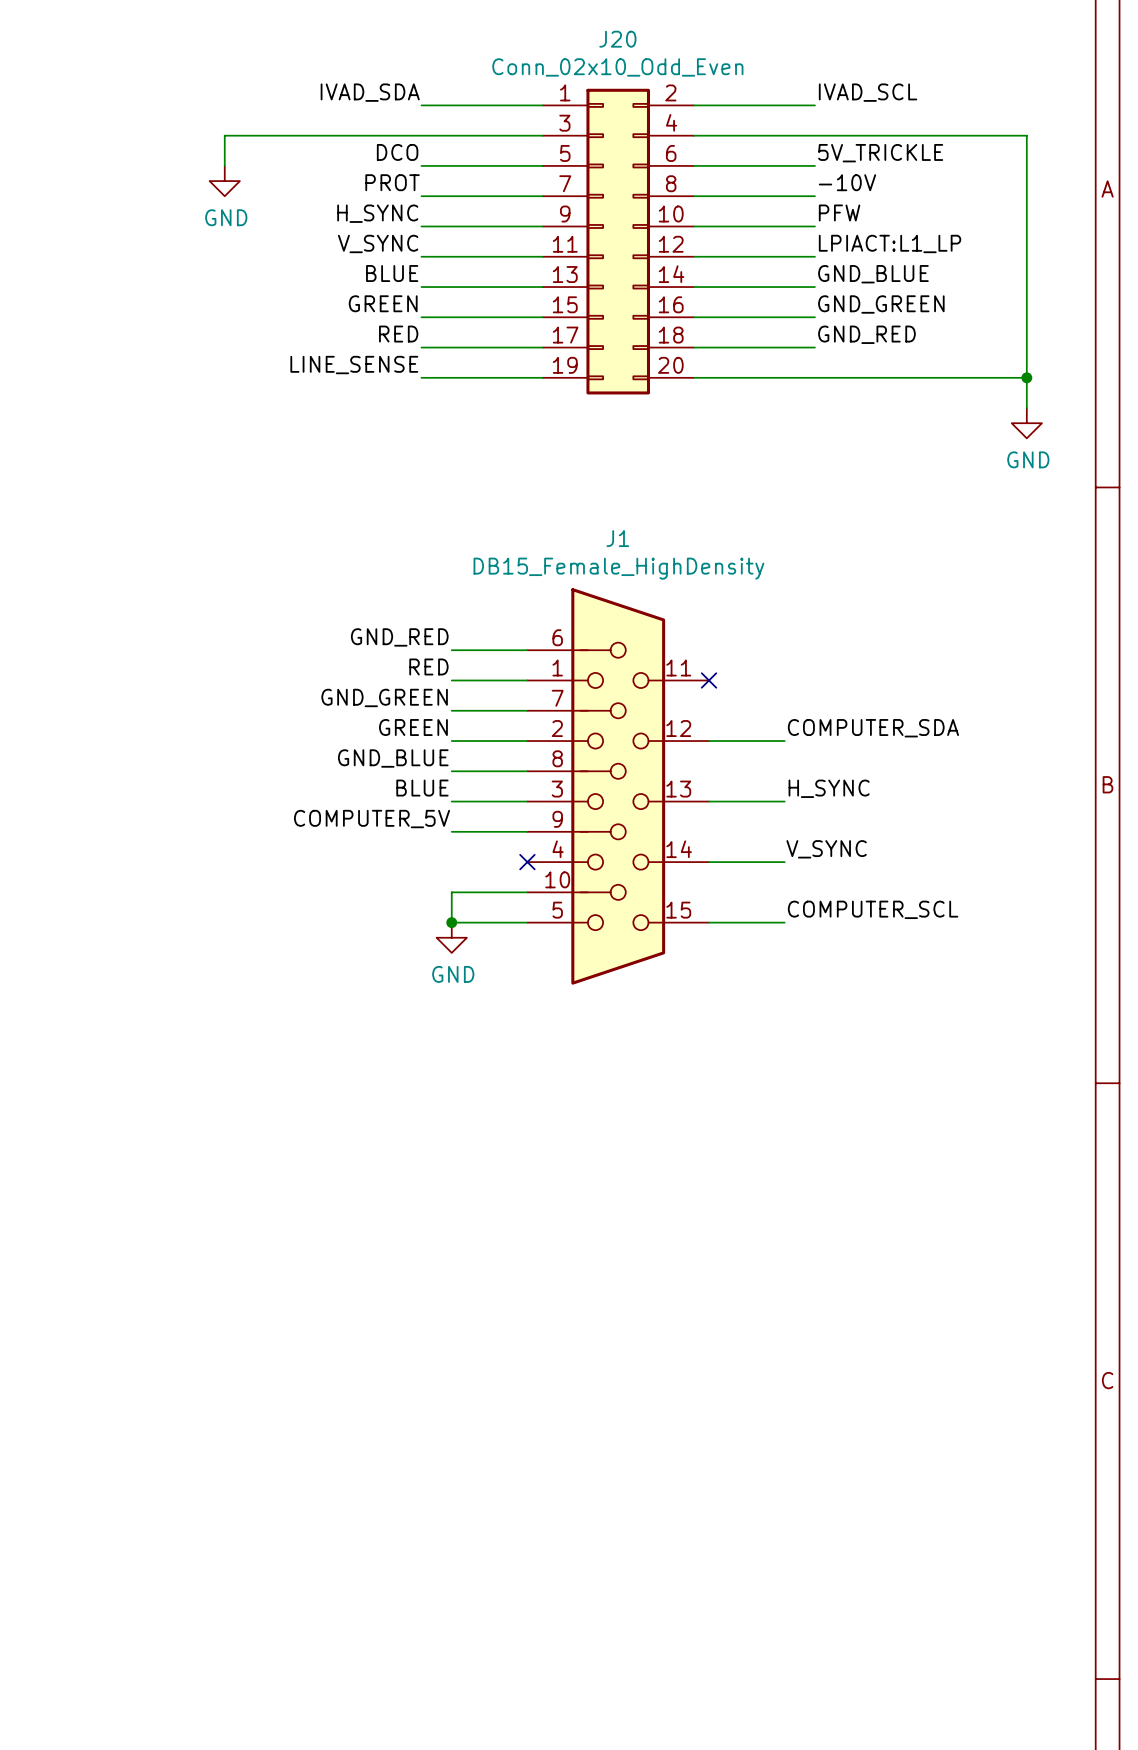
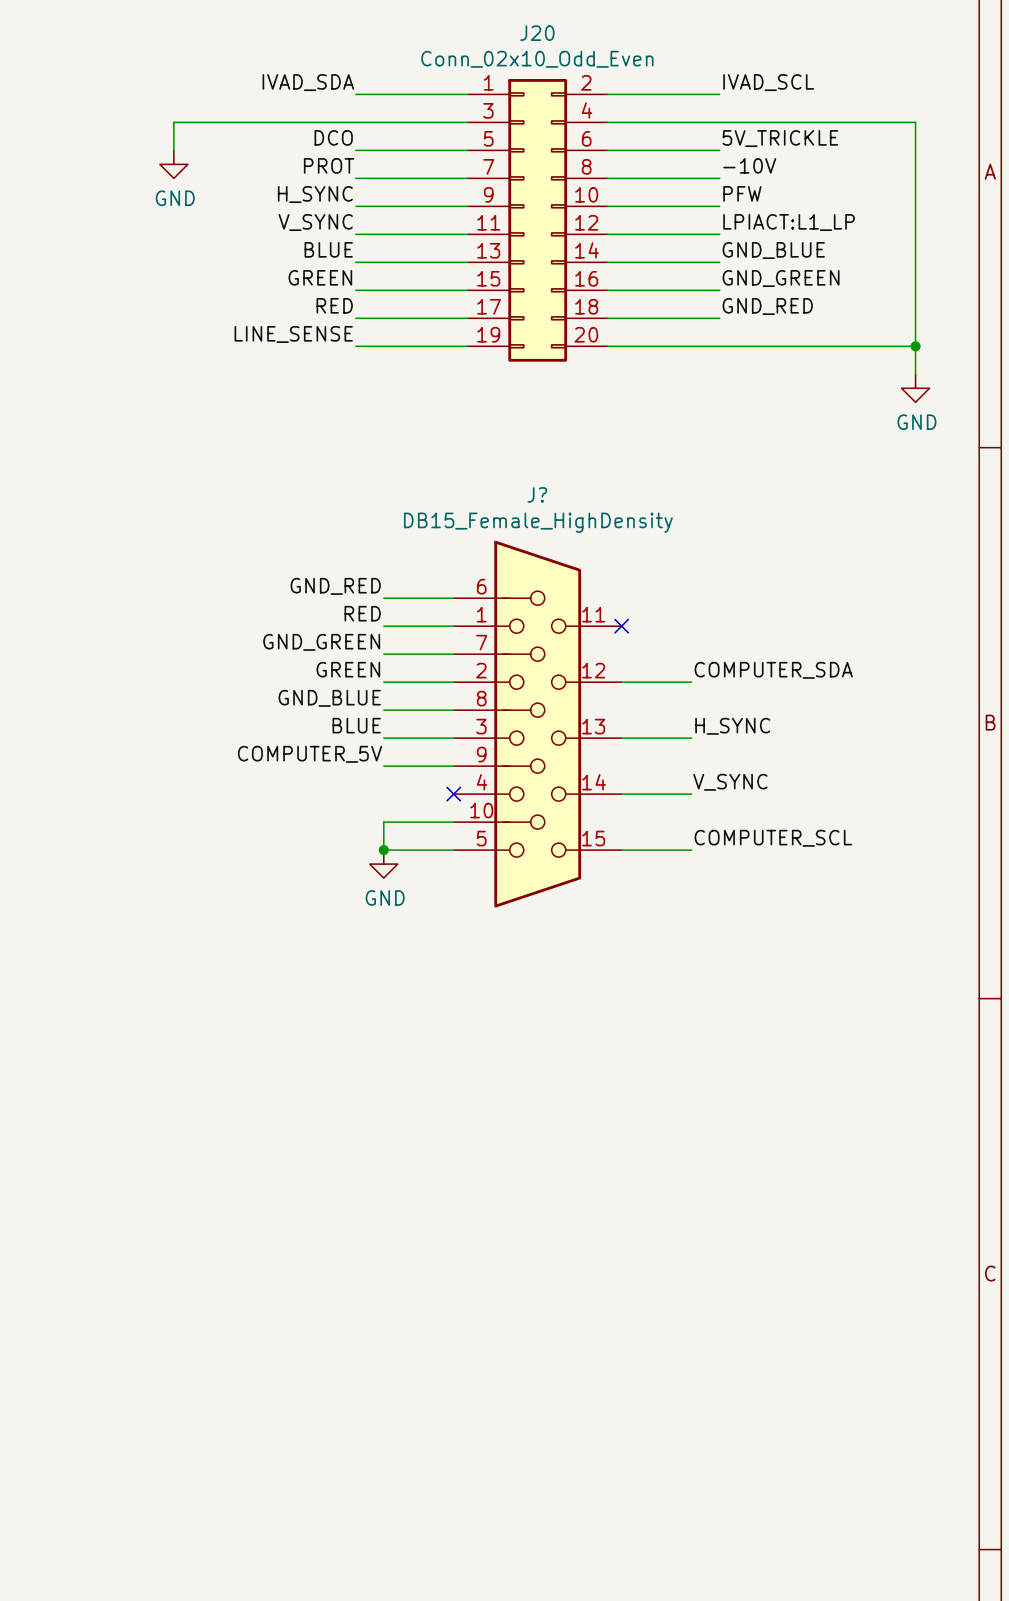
J1 name: J1 (617, 538) -> J? (537, 494)

